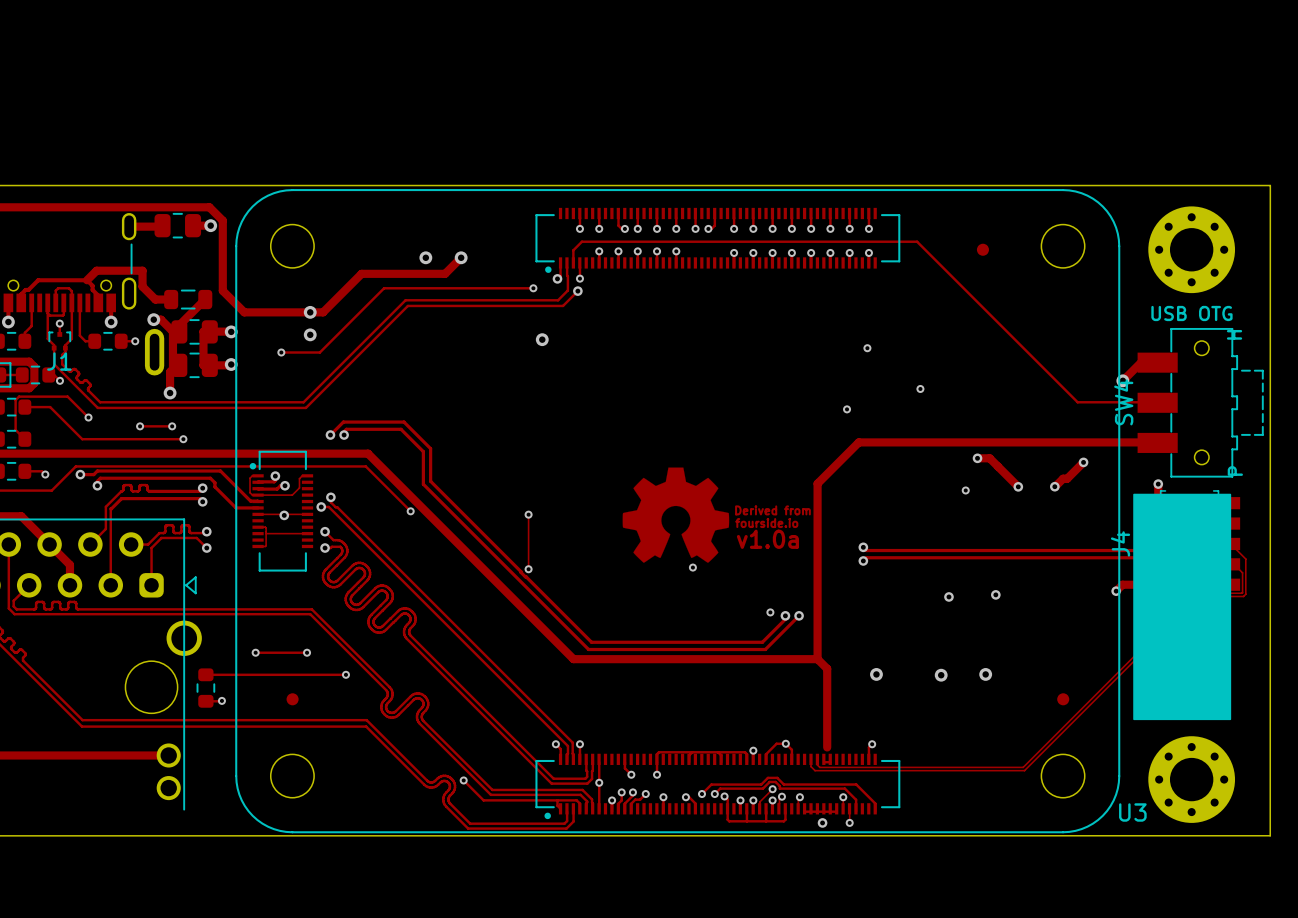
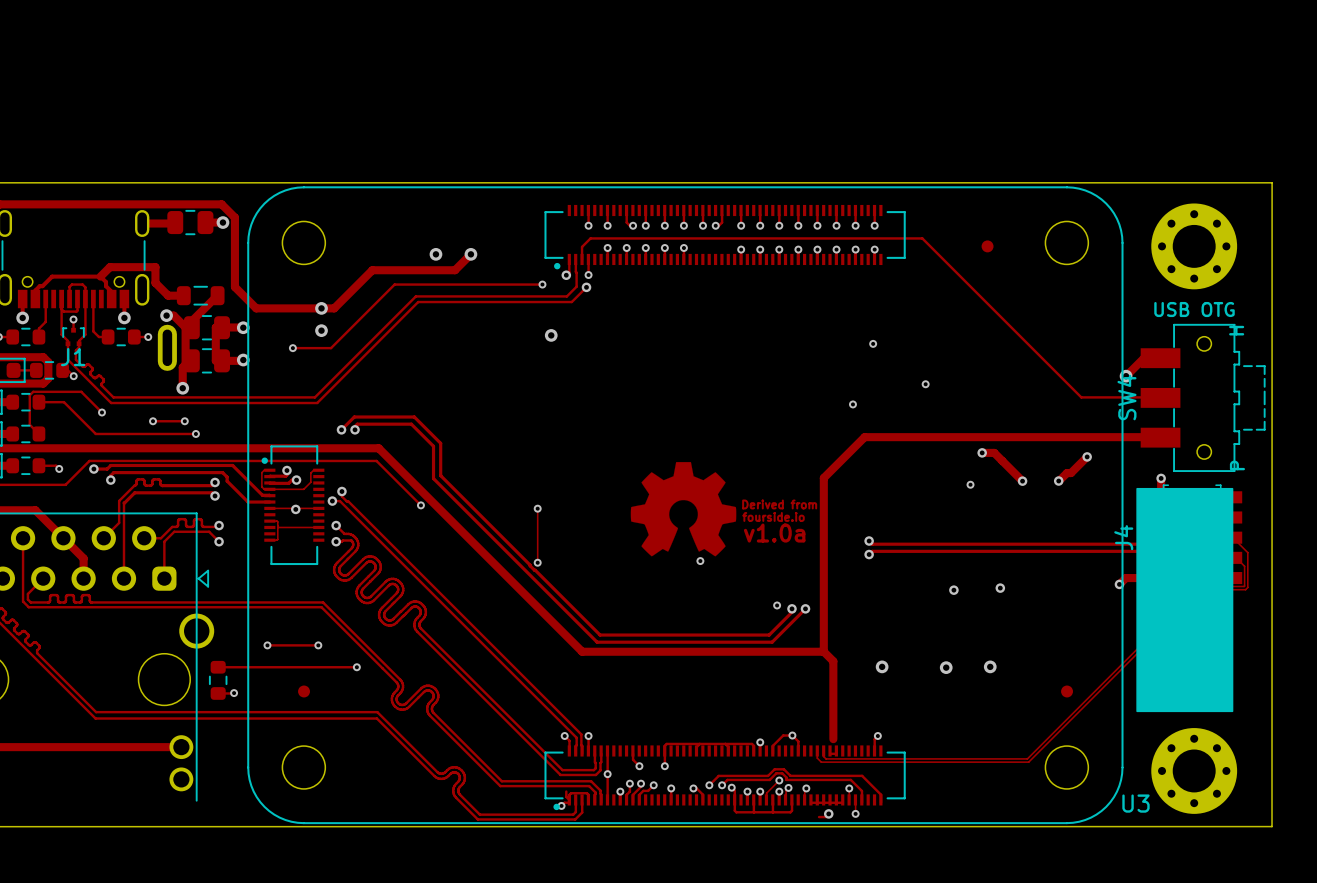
track: (463, 780) (483, 800) (576, 800) (578, 802) -> (561, 805) (564, 802) (569, 802) (571, 793) (586, 793)
via position: (463, 780) -> (561, 805)
track: none -> (819, 817) (827, 817)

